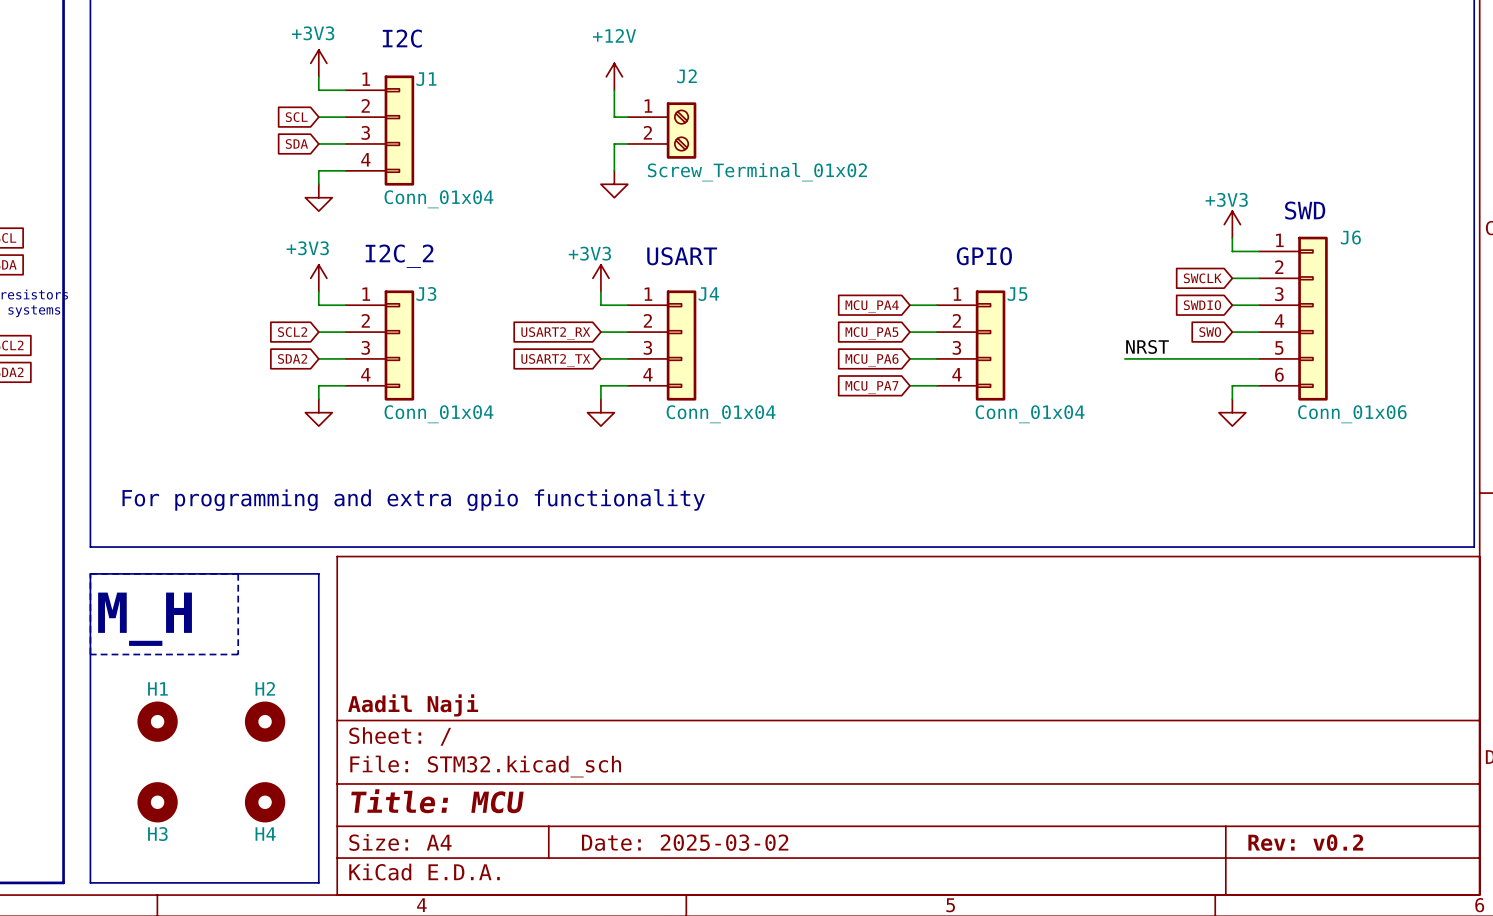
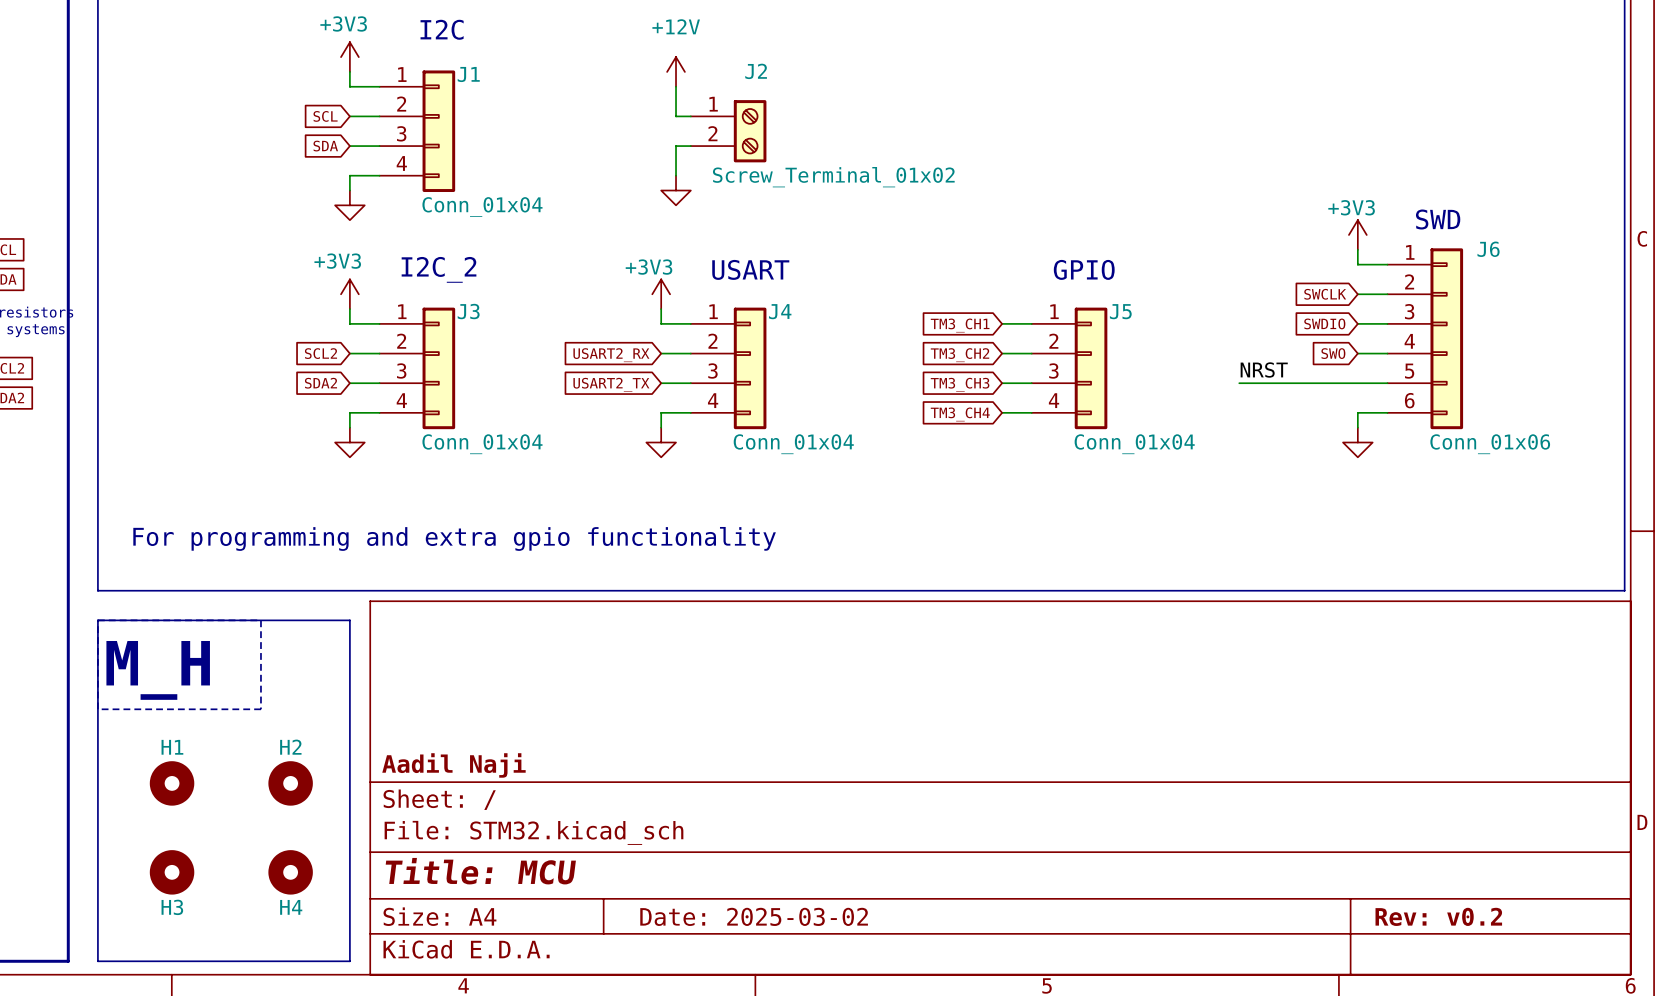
global label: MCU_PA4 (872, 306) -> TM3_CH1 (960, 325)
global label: MCU_PA5 (871, 333) -> TM3_CH2 (960, 355)
global label: MCU_PA6 (872, 360) -> TM3_CH3 (960, 384)
global label: MCU_PA7 (871, 387) -> TM3_CH4 (960, 414)

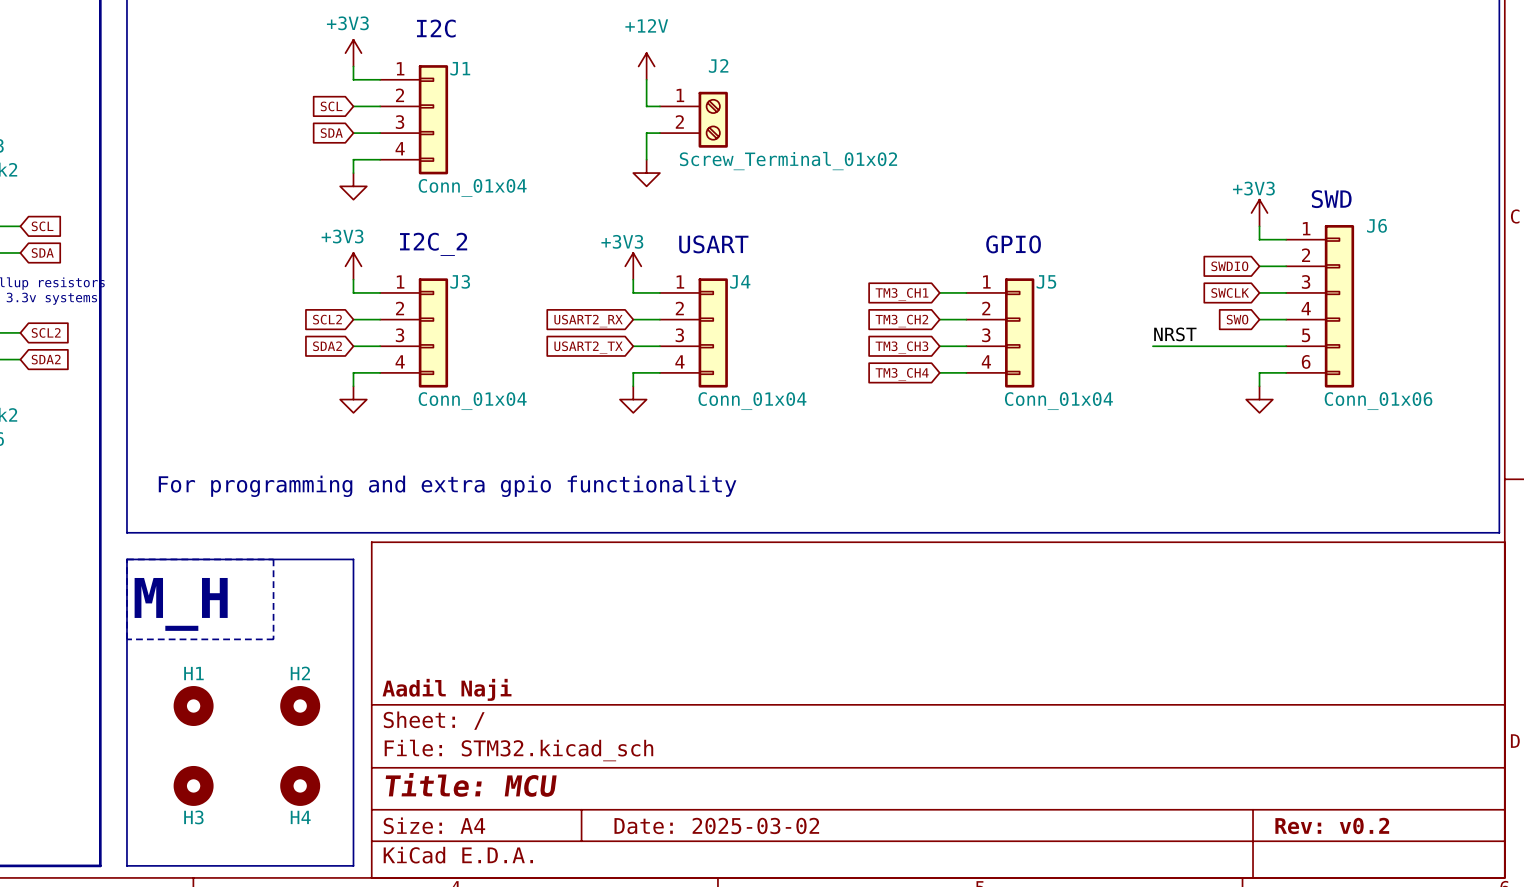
global label: SWCLK (1325, 294) -> SWDIO (1229, 266)
global label: SWDIO (1324, 323) -> SWCLK (1230, 292)

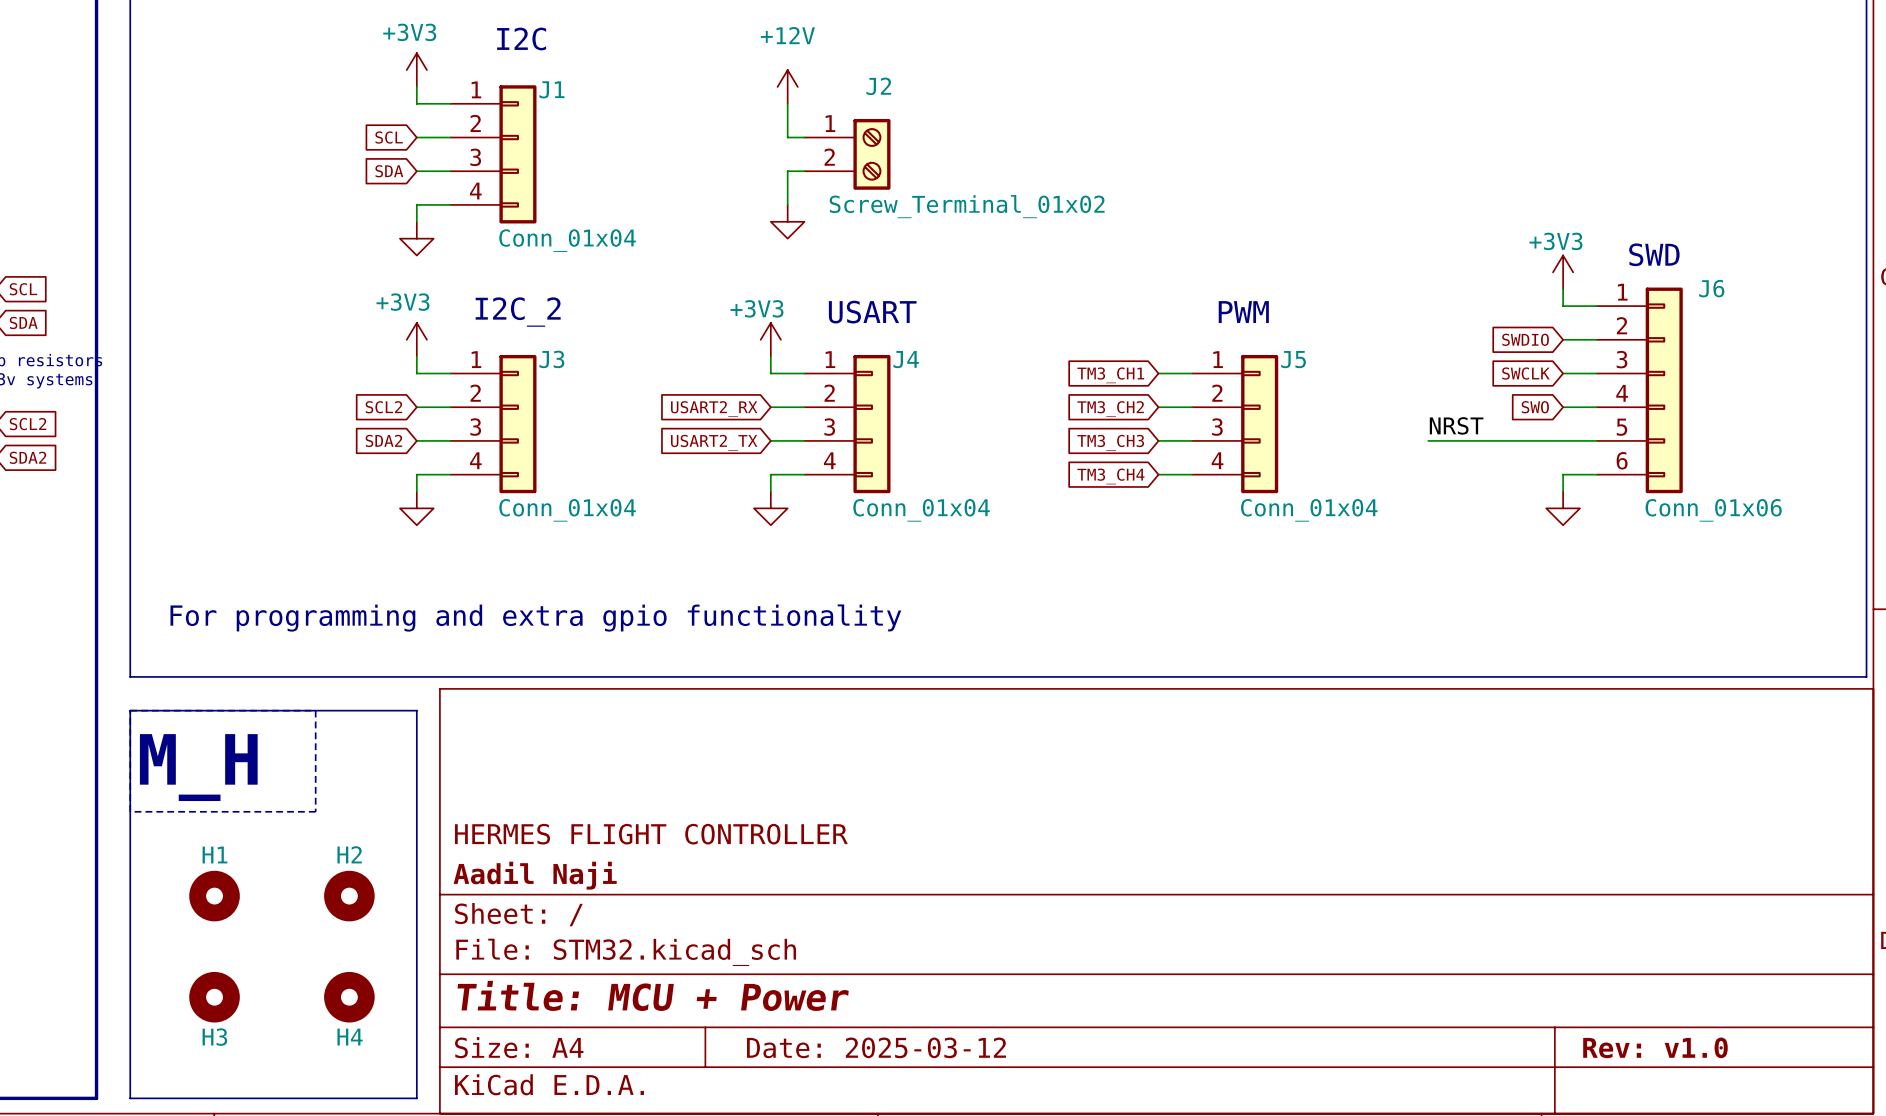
text: GPIO (1013, 244) -> PWM (1243, 312)
title block: none -> HERMES FLIGHT CONTROLLER (651, 834)
title block: Title: MCU (471, 784) -> Title: MCU + Power (653, 995)
title block: Date: 2025-03-02 (716, 825) -> Date: 2025-03-12 (876, 1047)
title block: Rev: v0.2 (1332, 825) -> Rev: v1.0 (1655, 1047)

